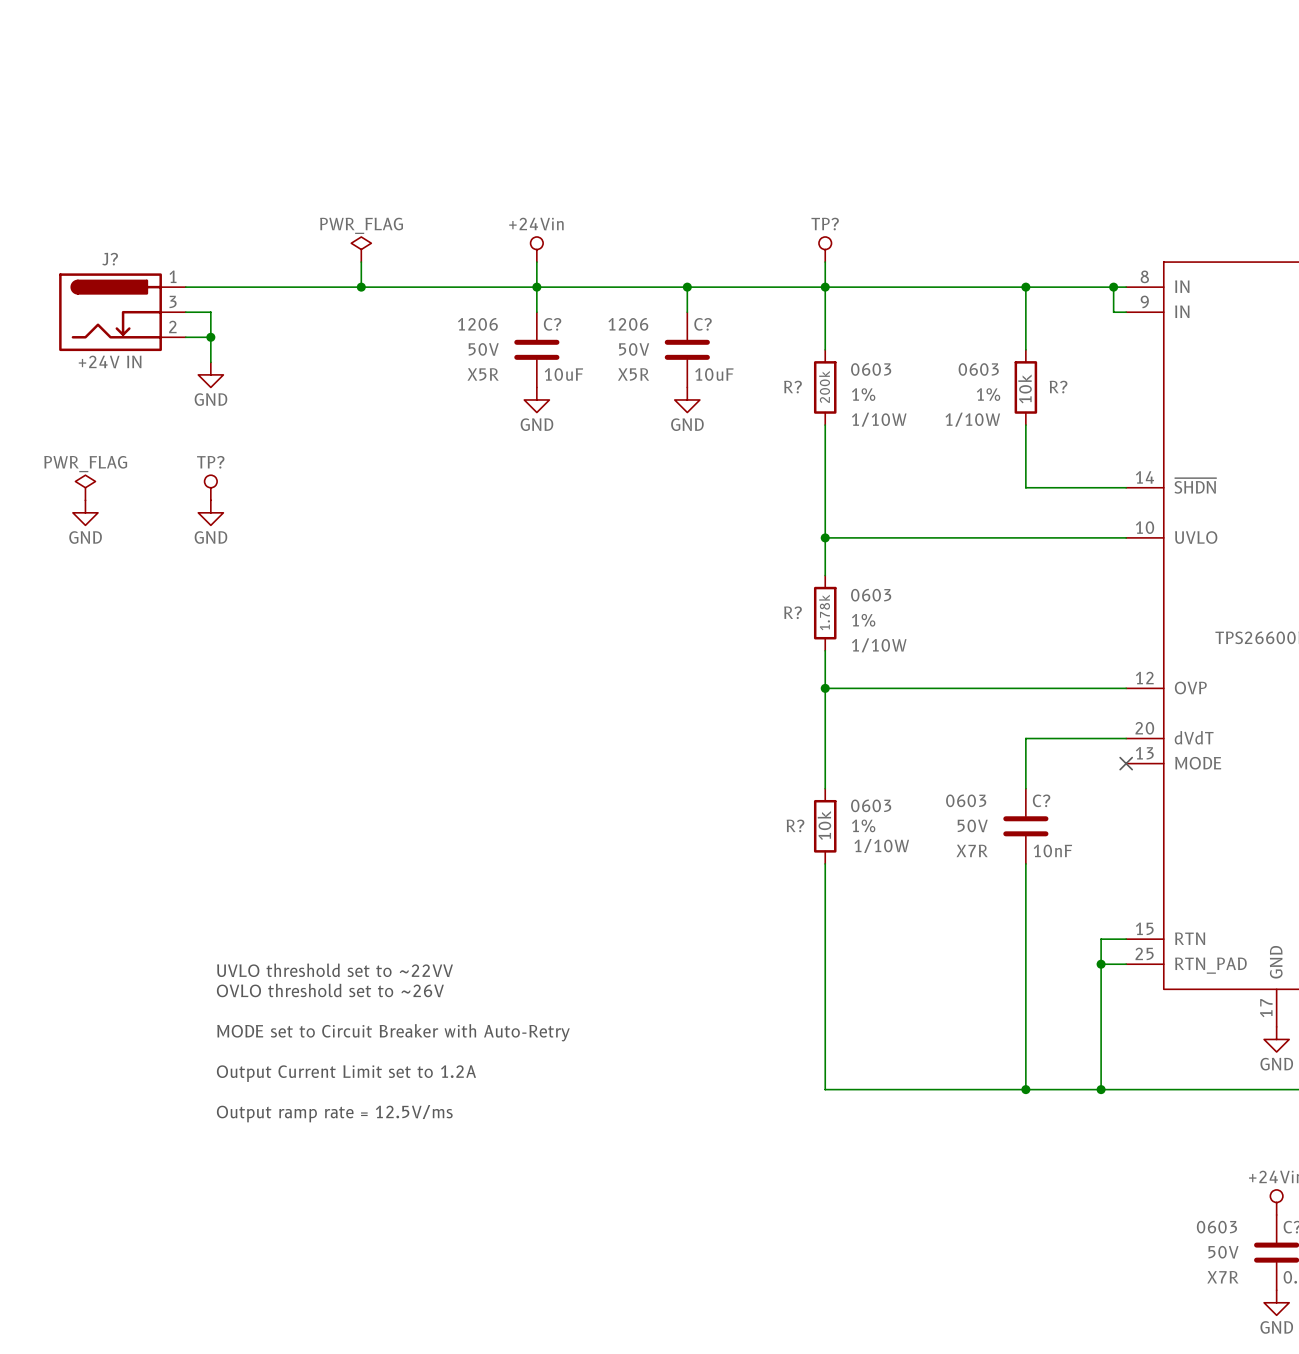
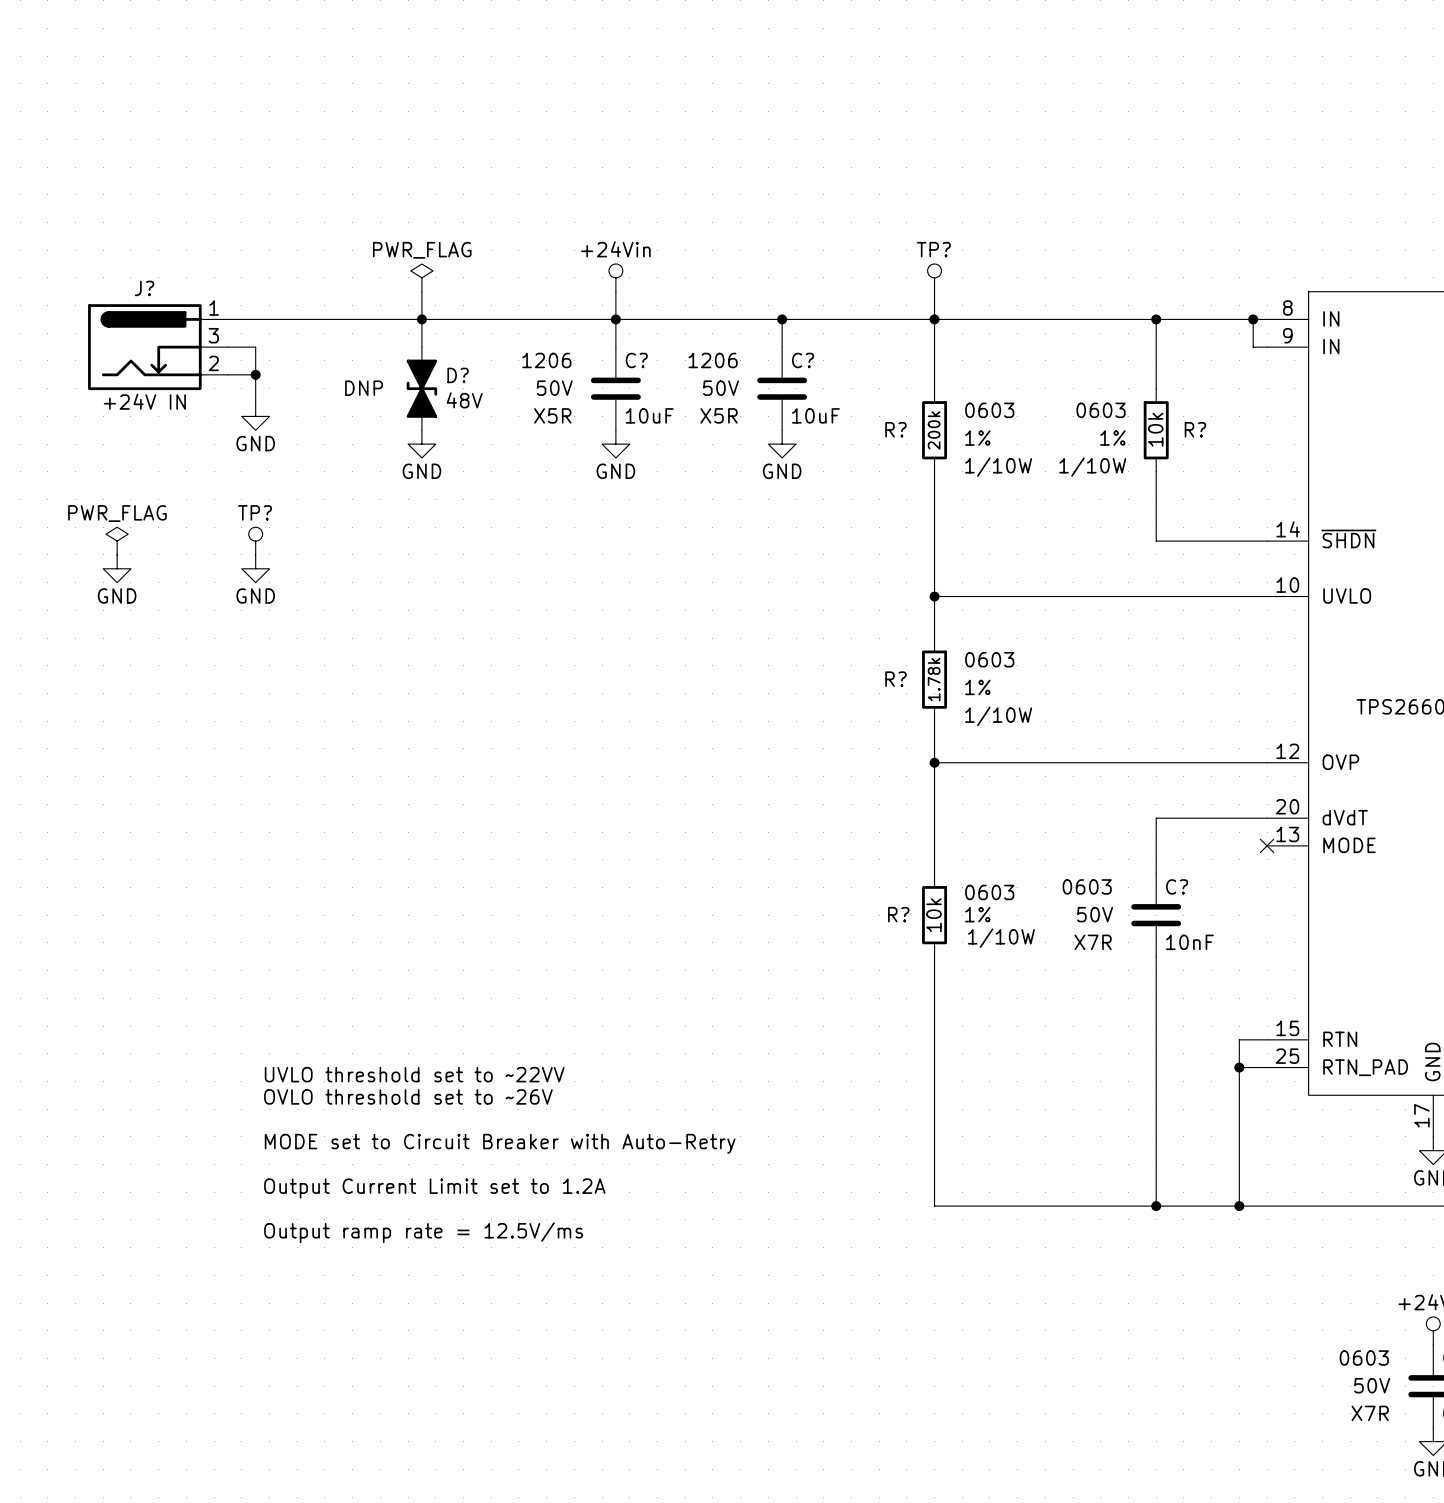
wire: none -> (421, 319) (421, 347)
D?: none -> 48V (421, 388)
power symbol: none -> GND (421, 444)

